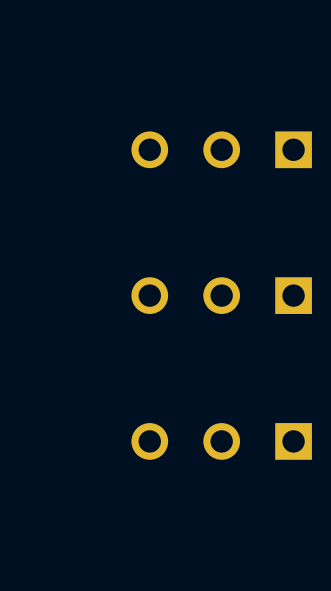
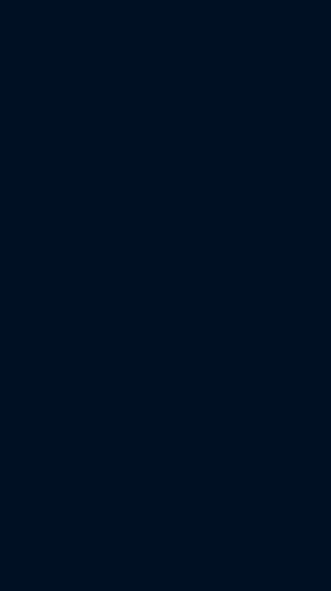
part: (221, 149) -> none
part: (221, 295) -> none
part: (221, 441) -> none

